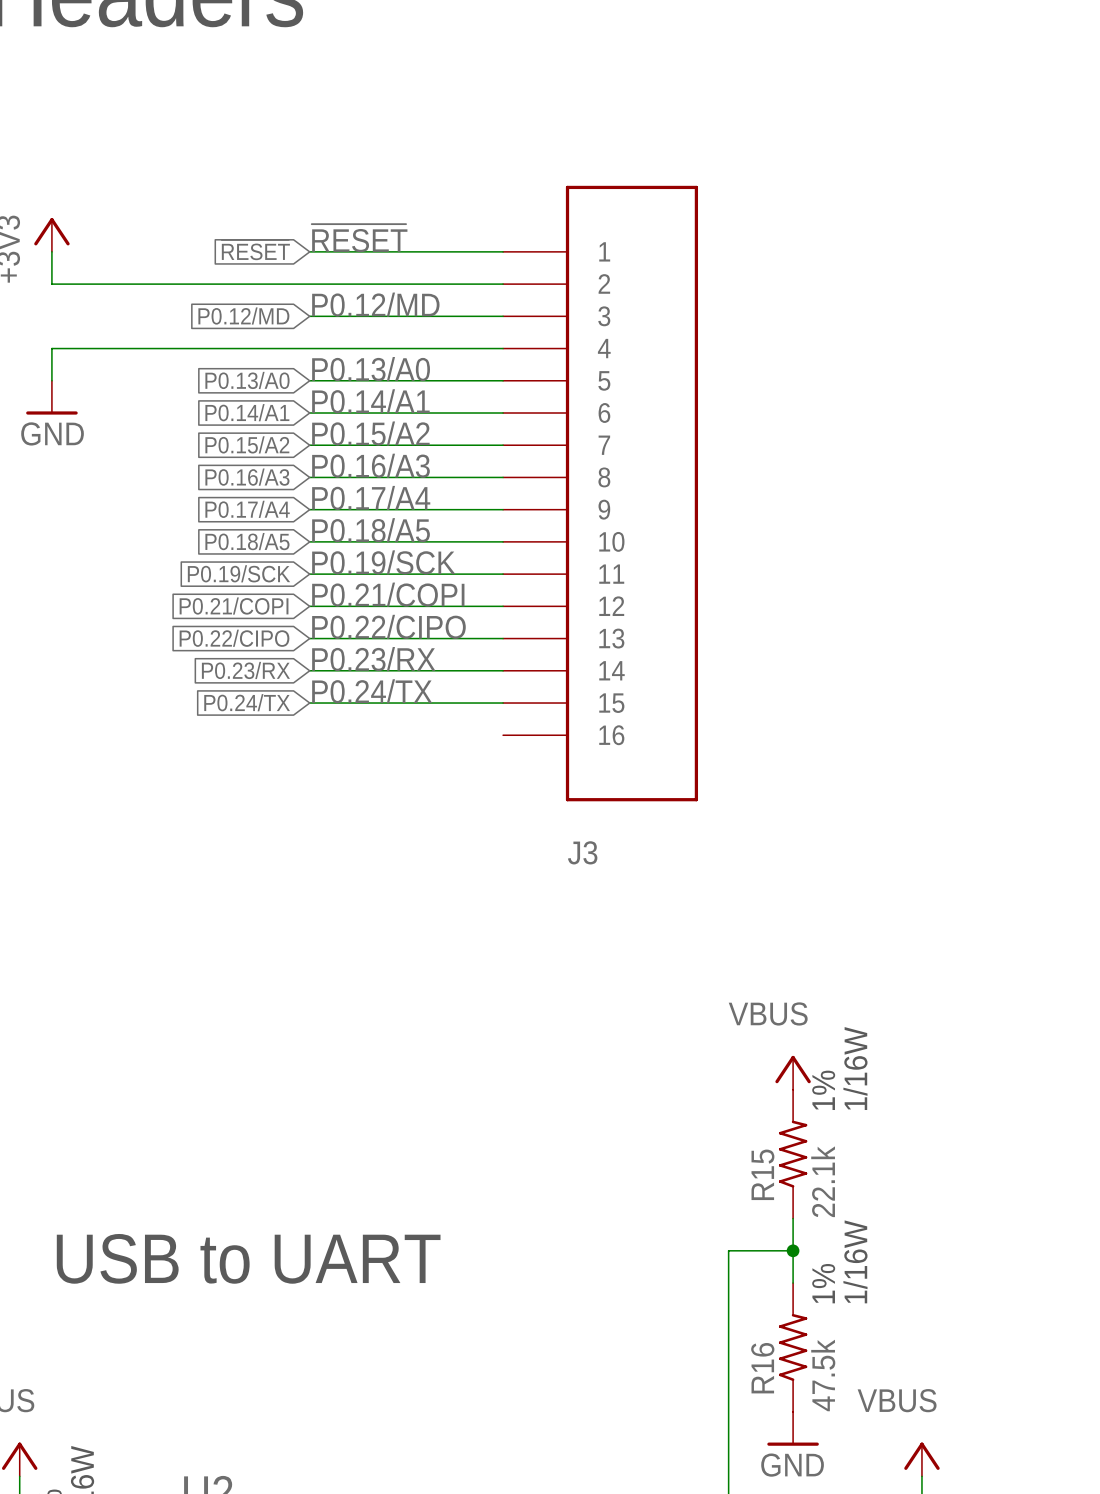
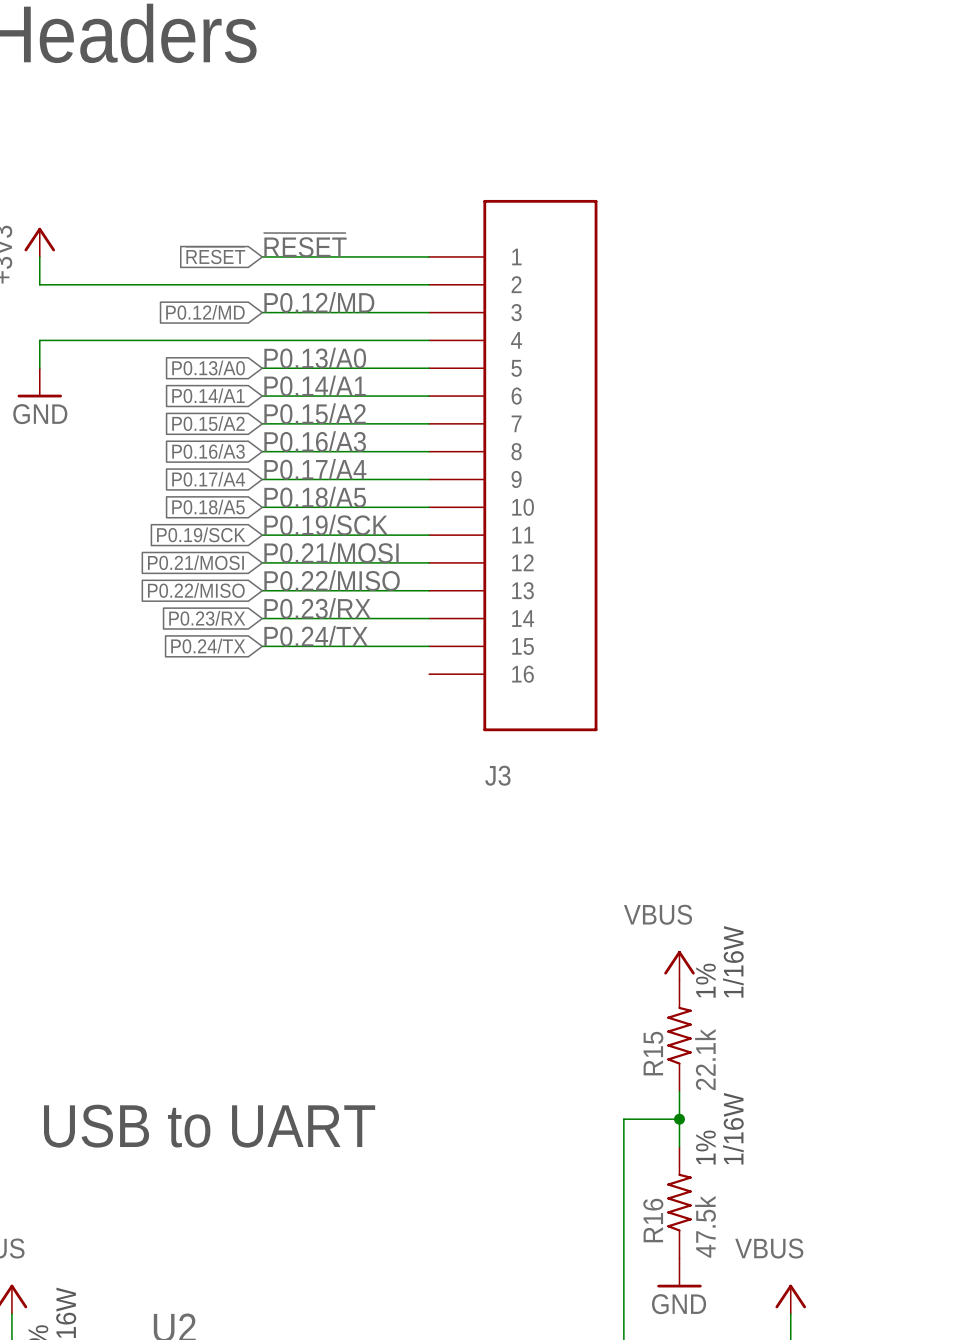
label: P0.21/COPI (388, 594) -> P0.21/MOSI (331, 552)
global label: P0.21/COPI (234, 606) -> P0.21/MOSI (195, 562)
label: P0.22/CIPO (388, 626) -> P0.22/MISO (332, 580)
global label: P0.22/CIPO (234, 638) -> P0.22/MISO (196, 590)

